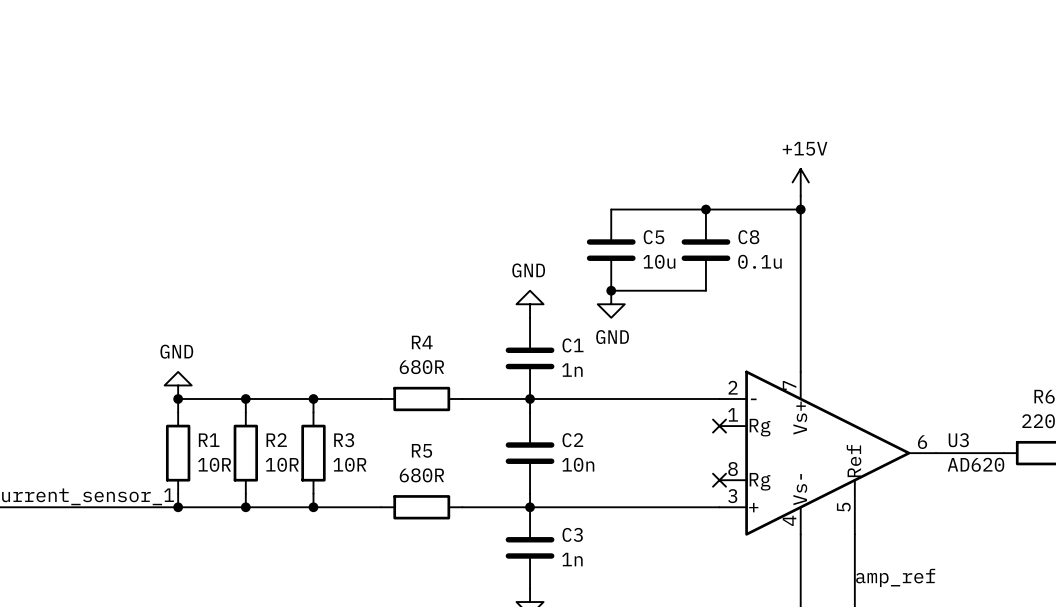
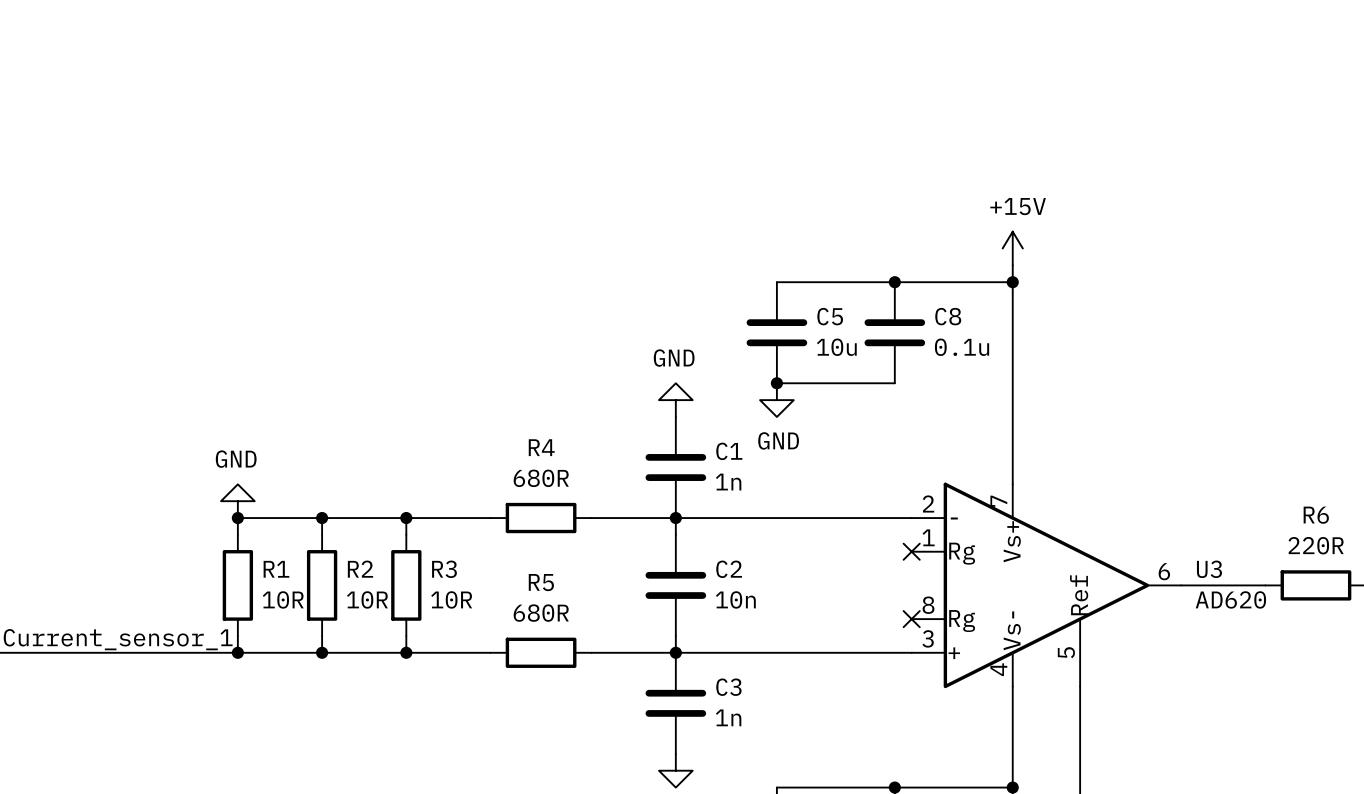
label: amp_ref (895, 577) -> none

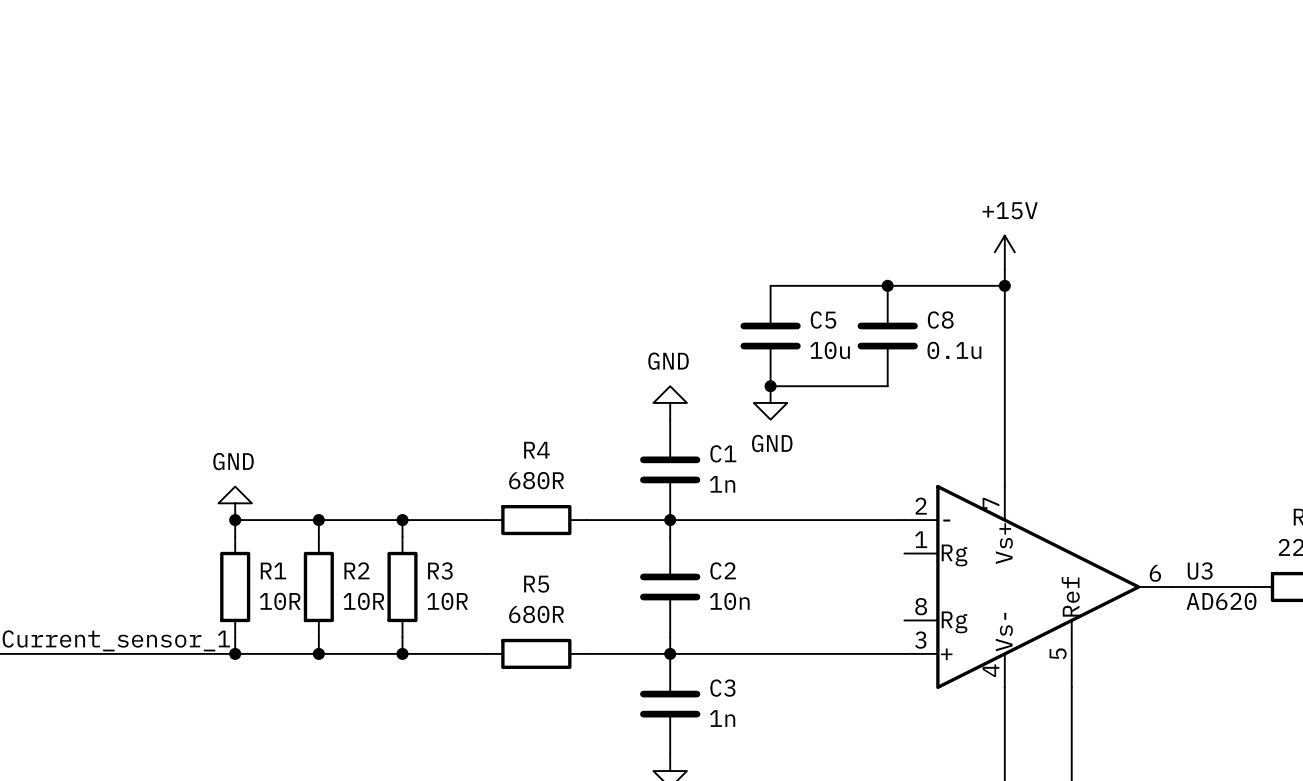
no-connect mark: (911, 551) -> none
no-connect mark: (911, 619) -> none

